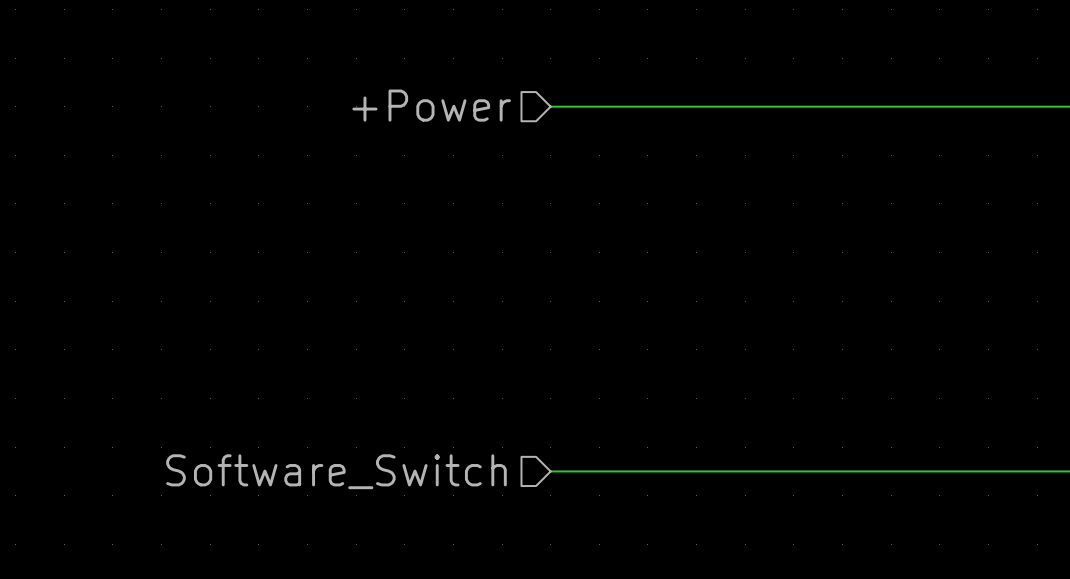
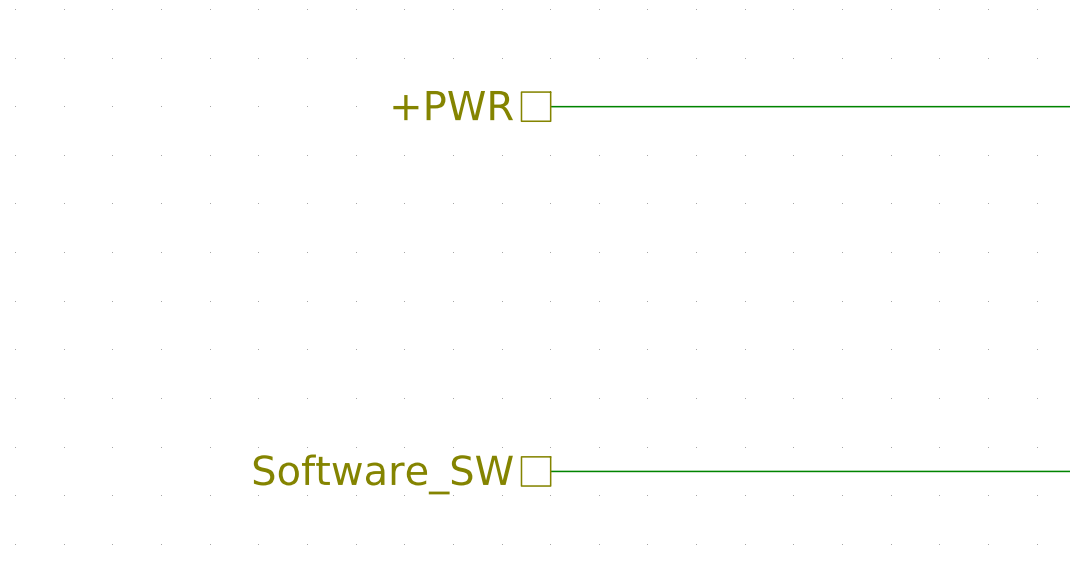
hierarchical label shape: input (431, 105) -> passive (453, 105)
hierarchical label: +Power (431, 105) -> +PWR (453, 105)
hierarchical label shape: input (336, 471) -> passive (383, 474)
hierarchical label: Software_Switch (336, 471) -> Software_SW (383, 474)

